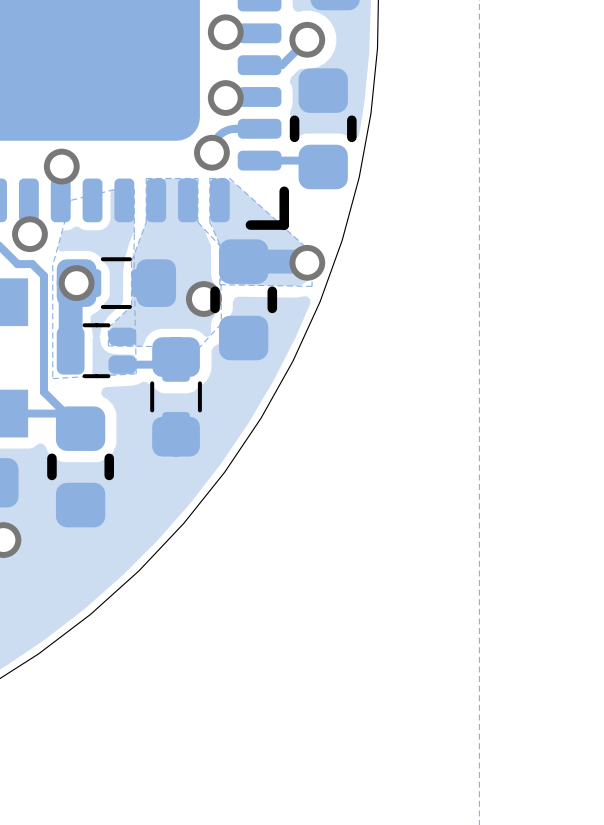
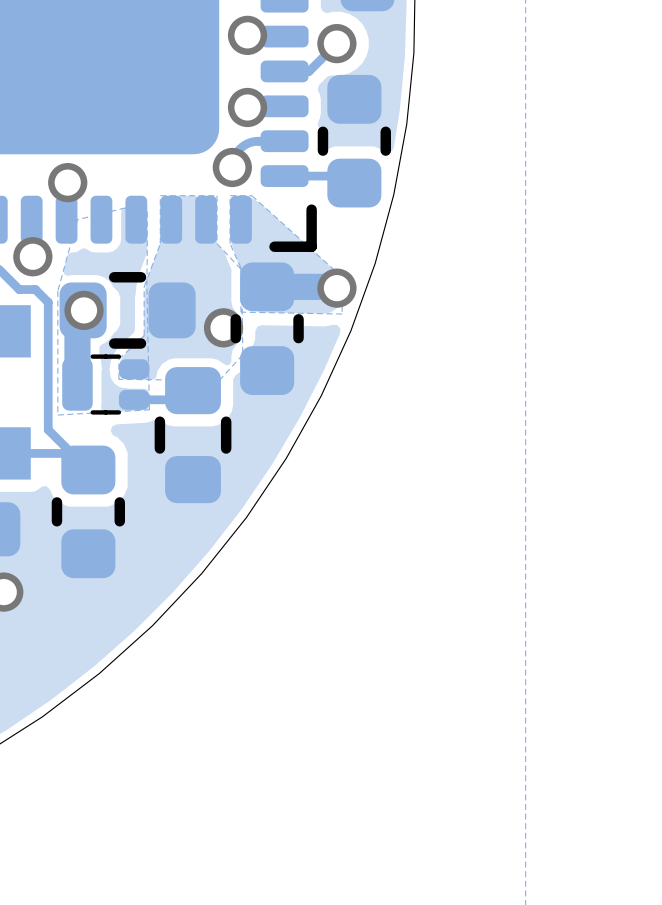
part footprint: [56, 257, 177, 309] -> [59, 272, 196, 349]
part footprint: [150, 337, 202, 457] -> [154, 367, 232, 504]

